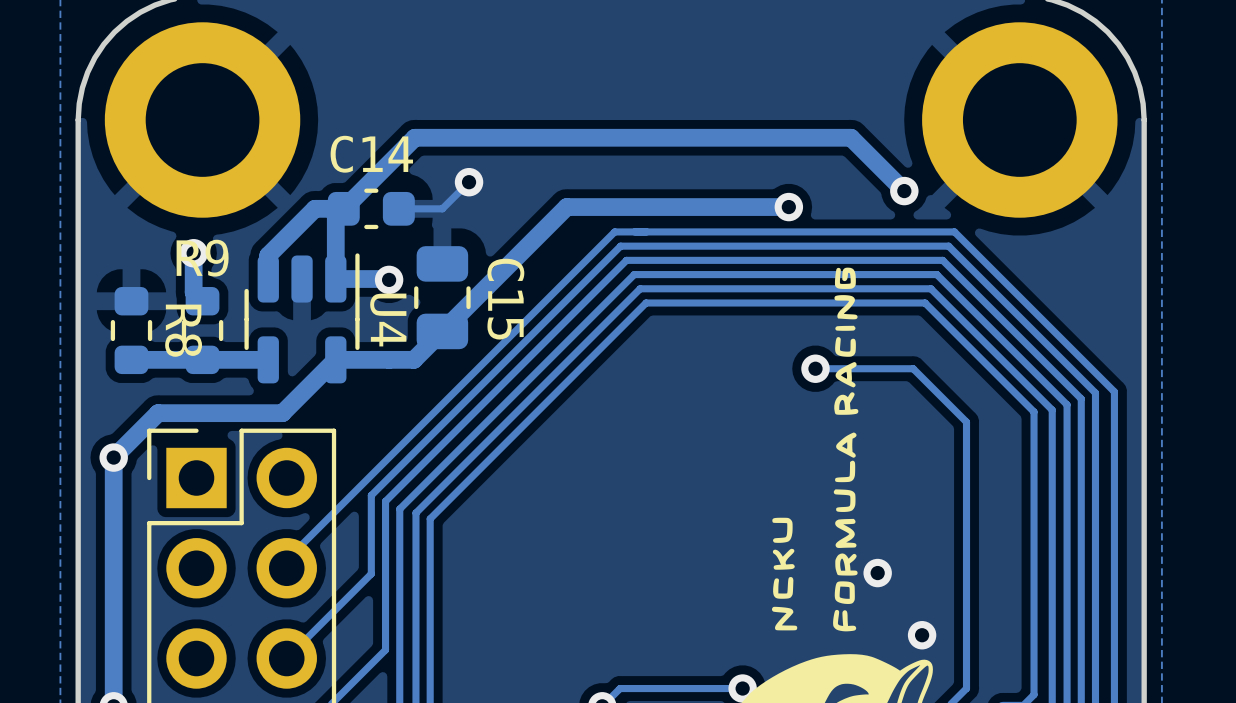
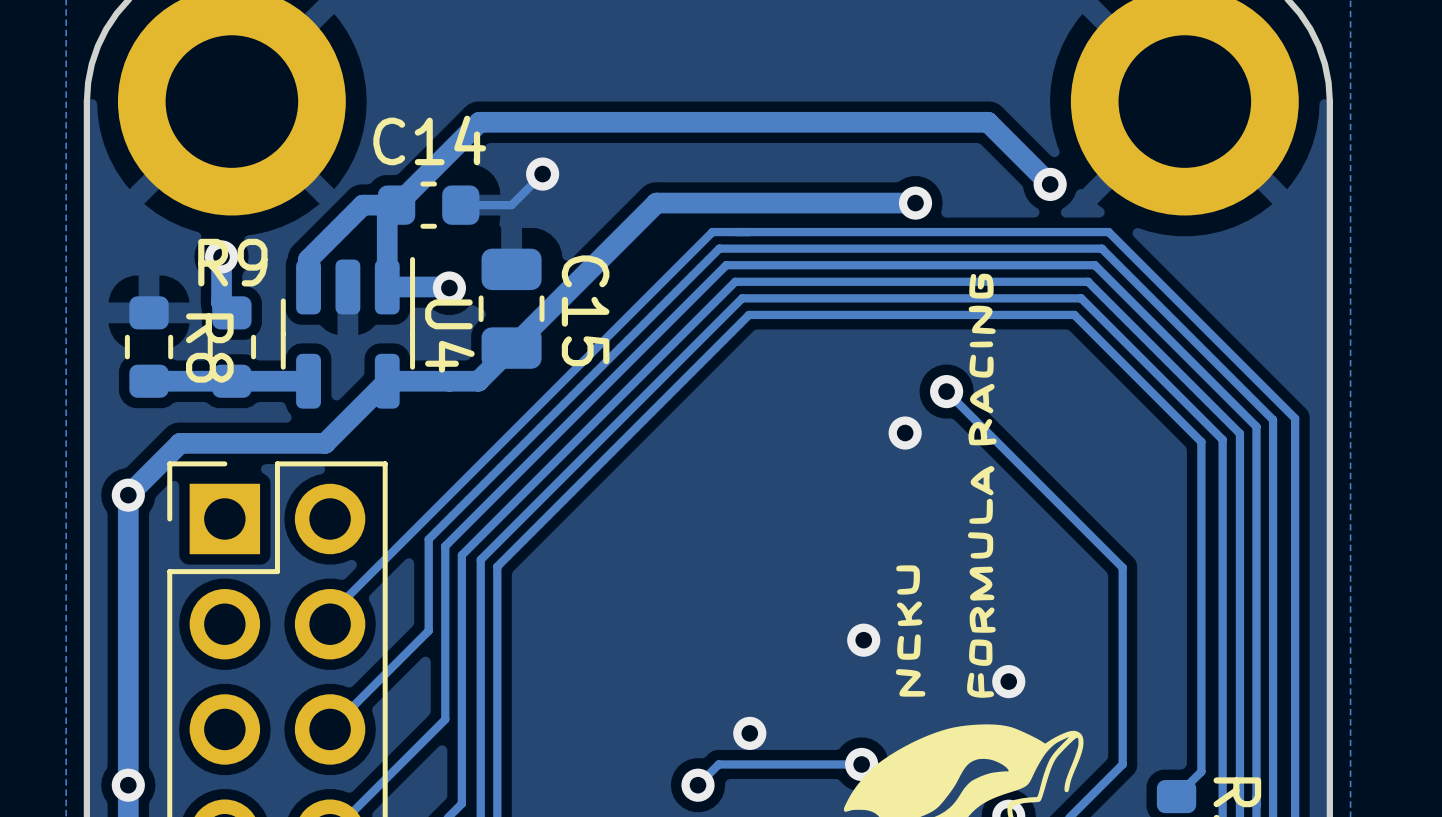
track: (815, 368) (913, 368) (966, 422) (966, 519) -> (946, 391) (1122, 567)
via: none -> (905, 433)
via: (877, 573) -> none
via: none -> (863, 640)
via: none -> (1008, 681)
via: (922, 635) -> none
via: none -> (749, 733)

